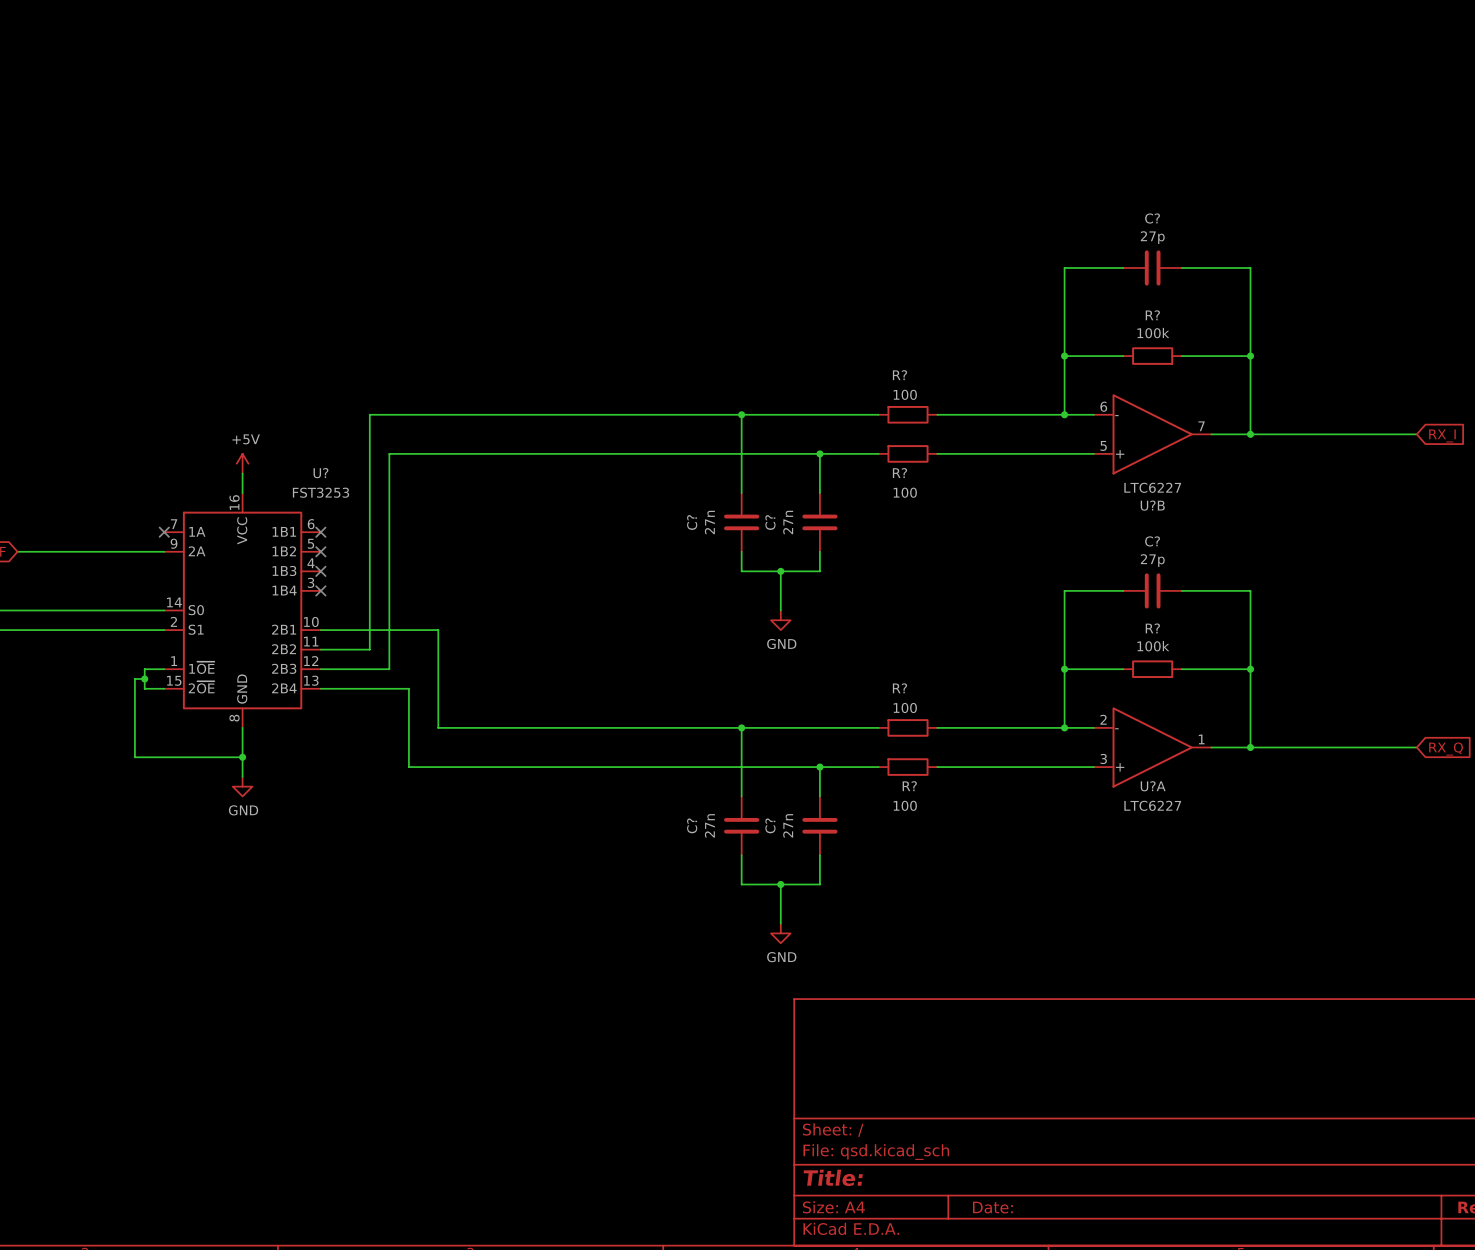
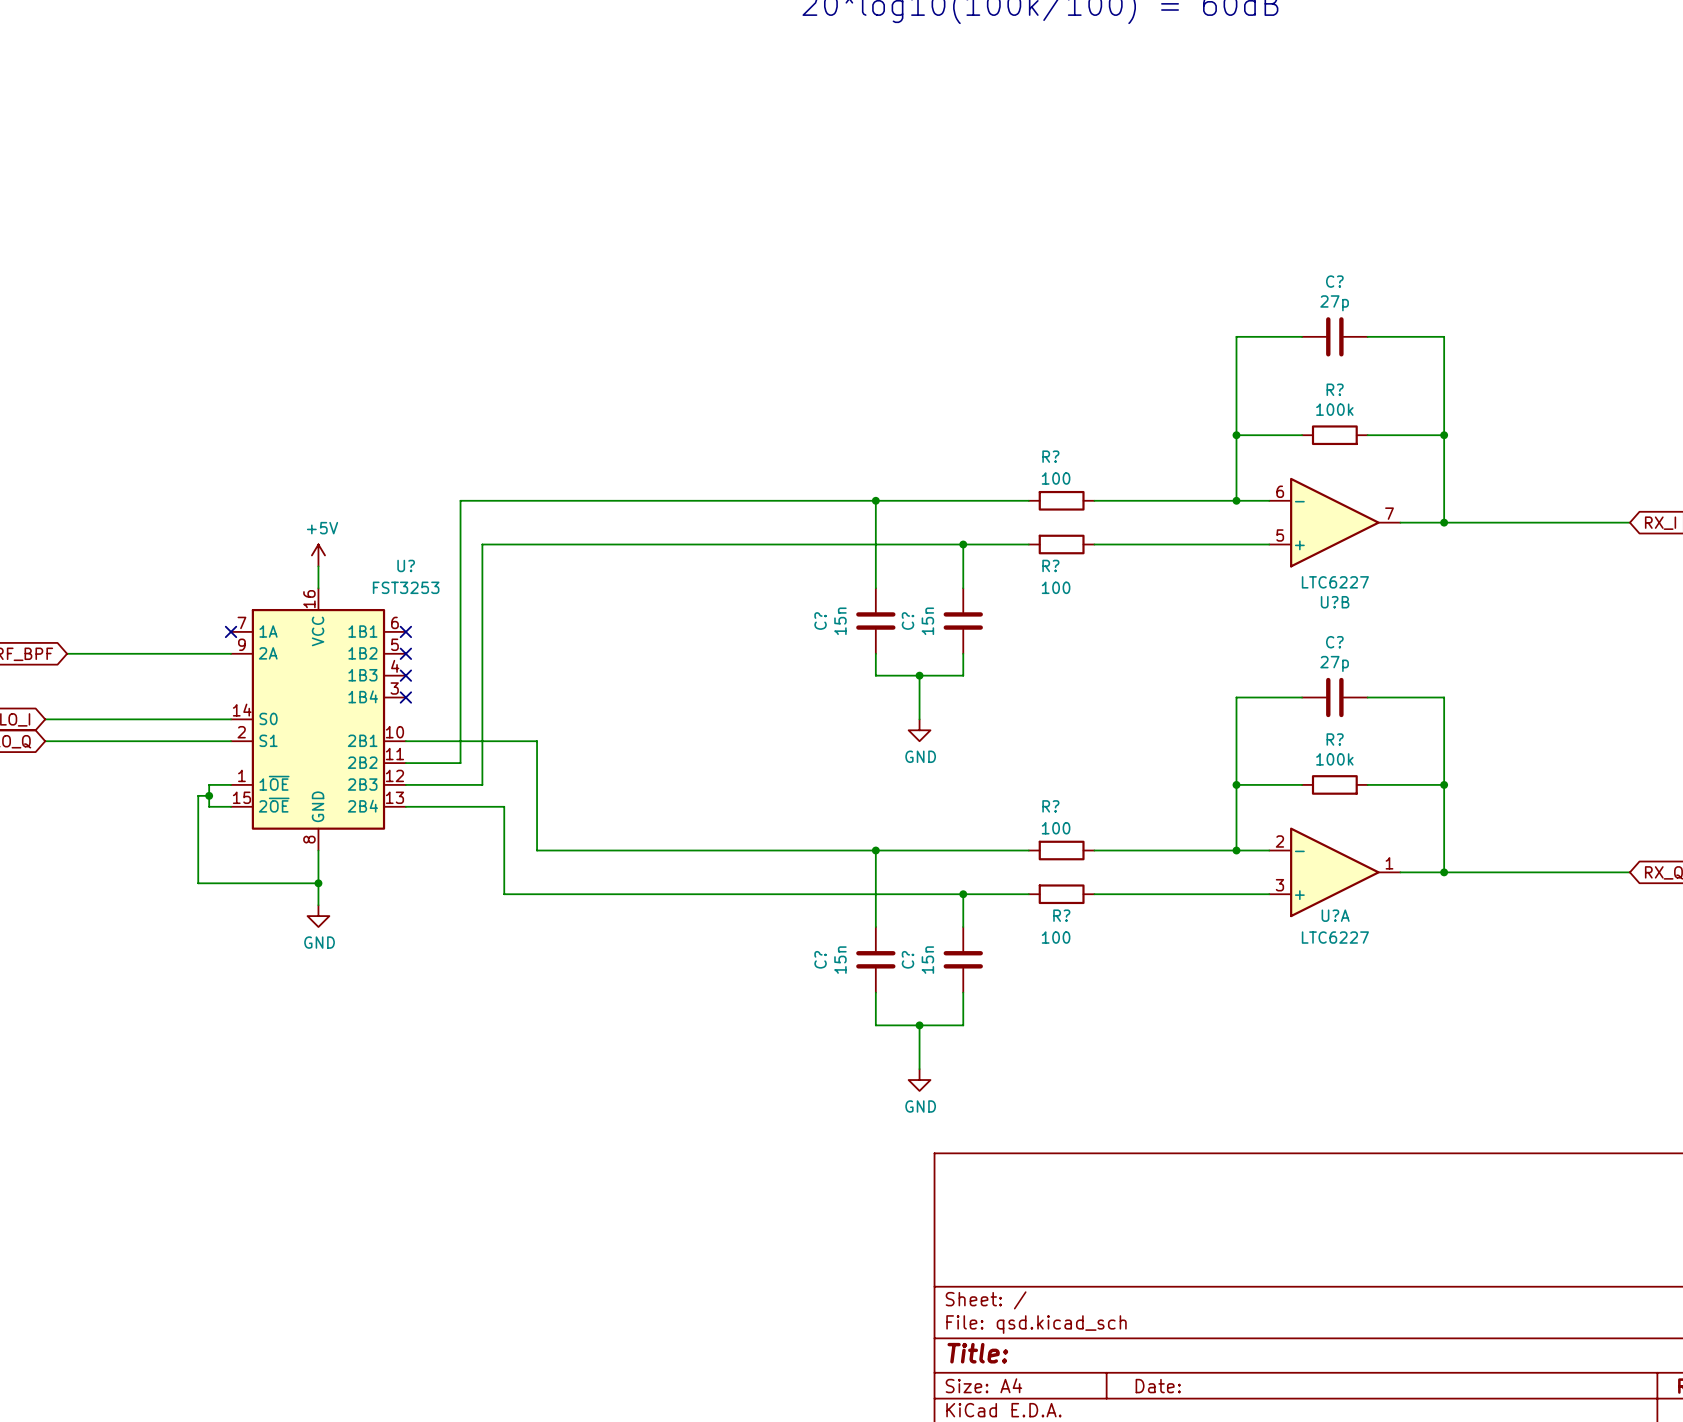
C? value: 27n (709, 522) -> 15n (840, 621)
C? value: 27n (788, 522) -> 15n (927, 621)
C? value: 27n (709, 825) -> 15n (840, 960)
C? value: 27n (788, 825) -> 15n (927, 960)

